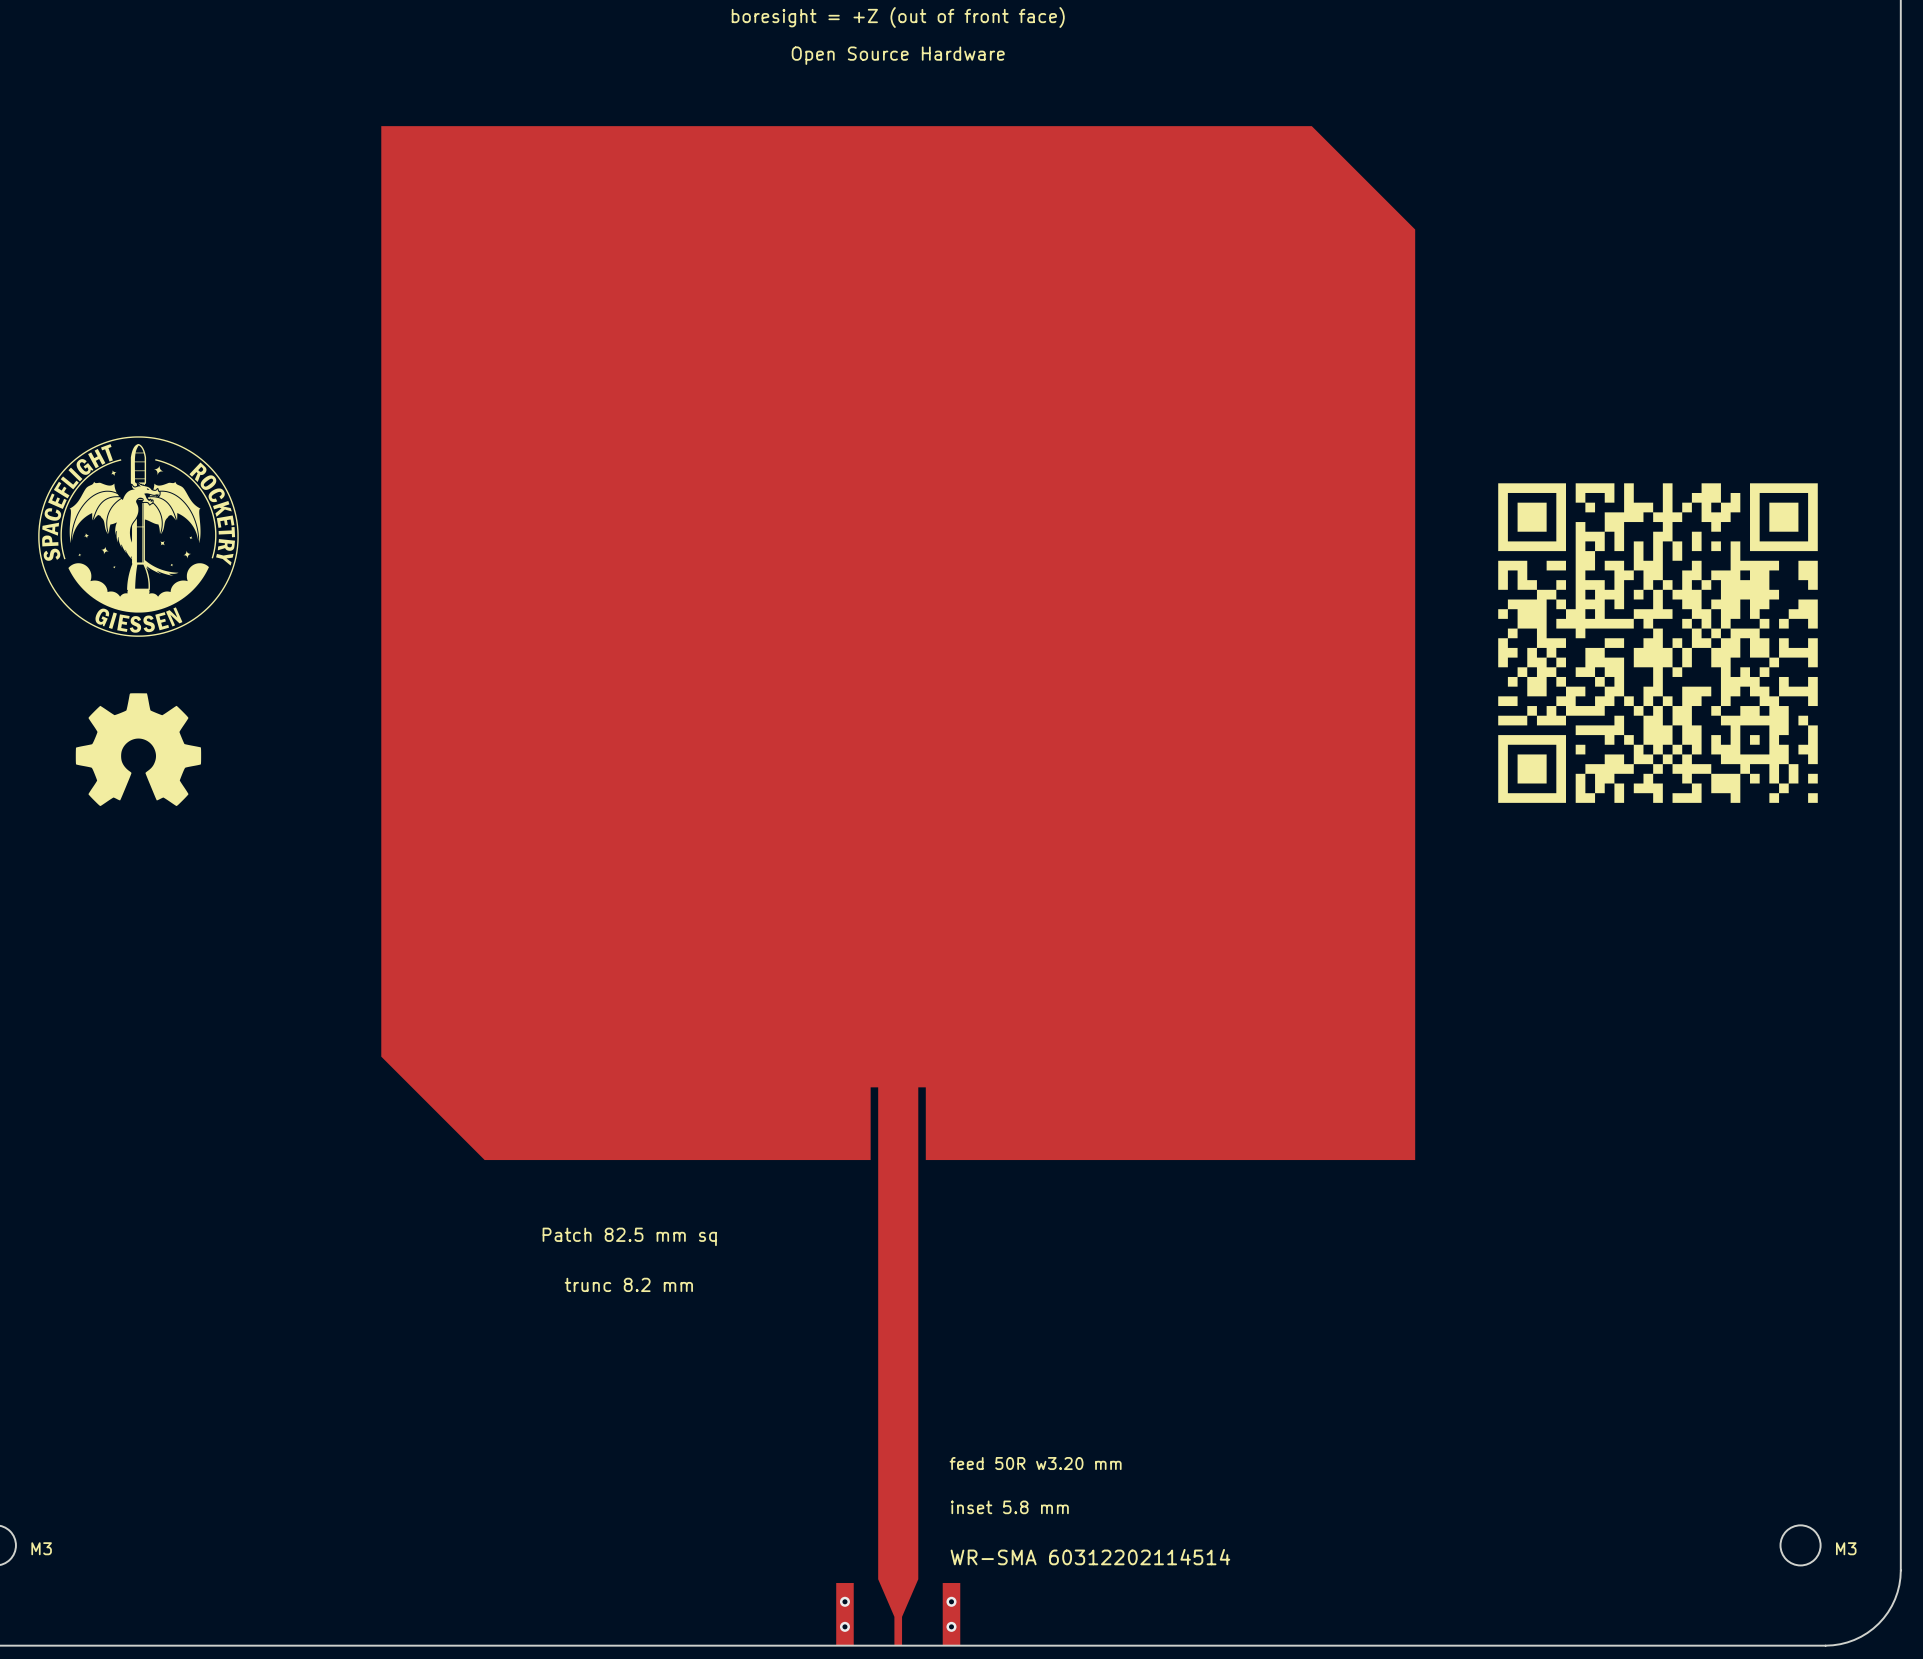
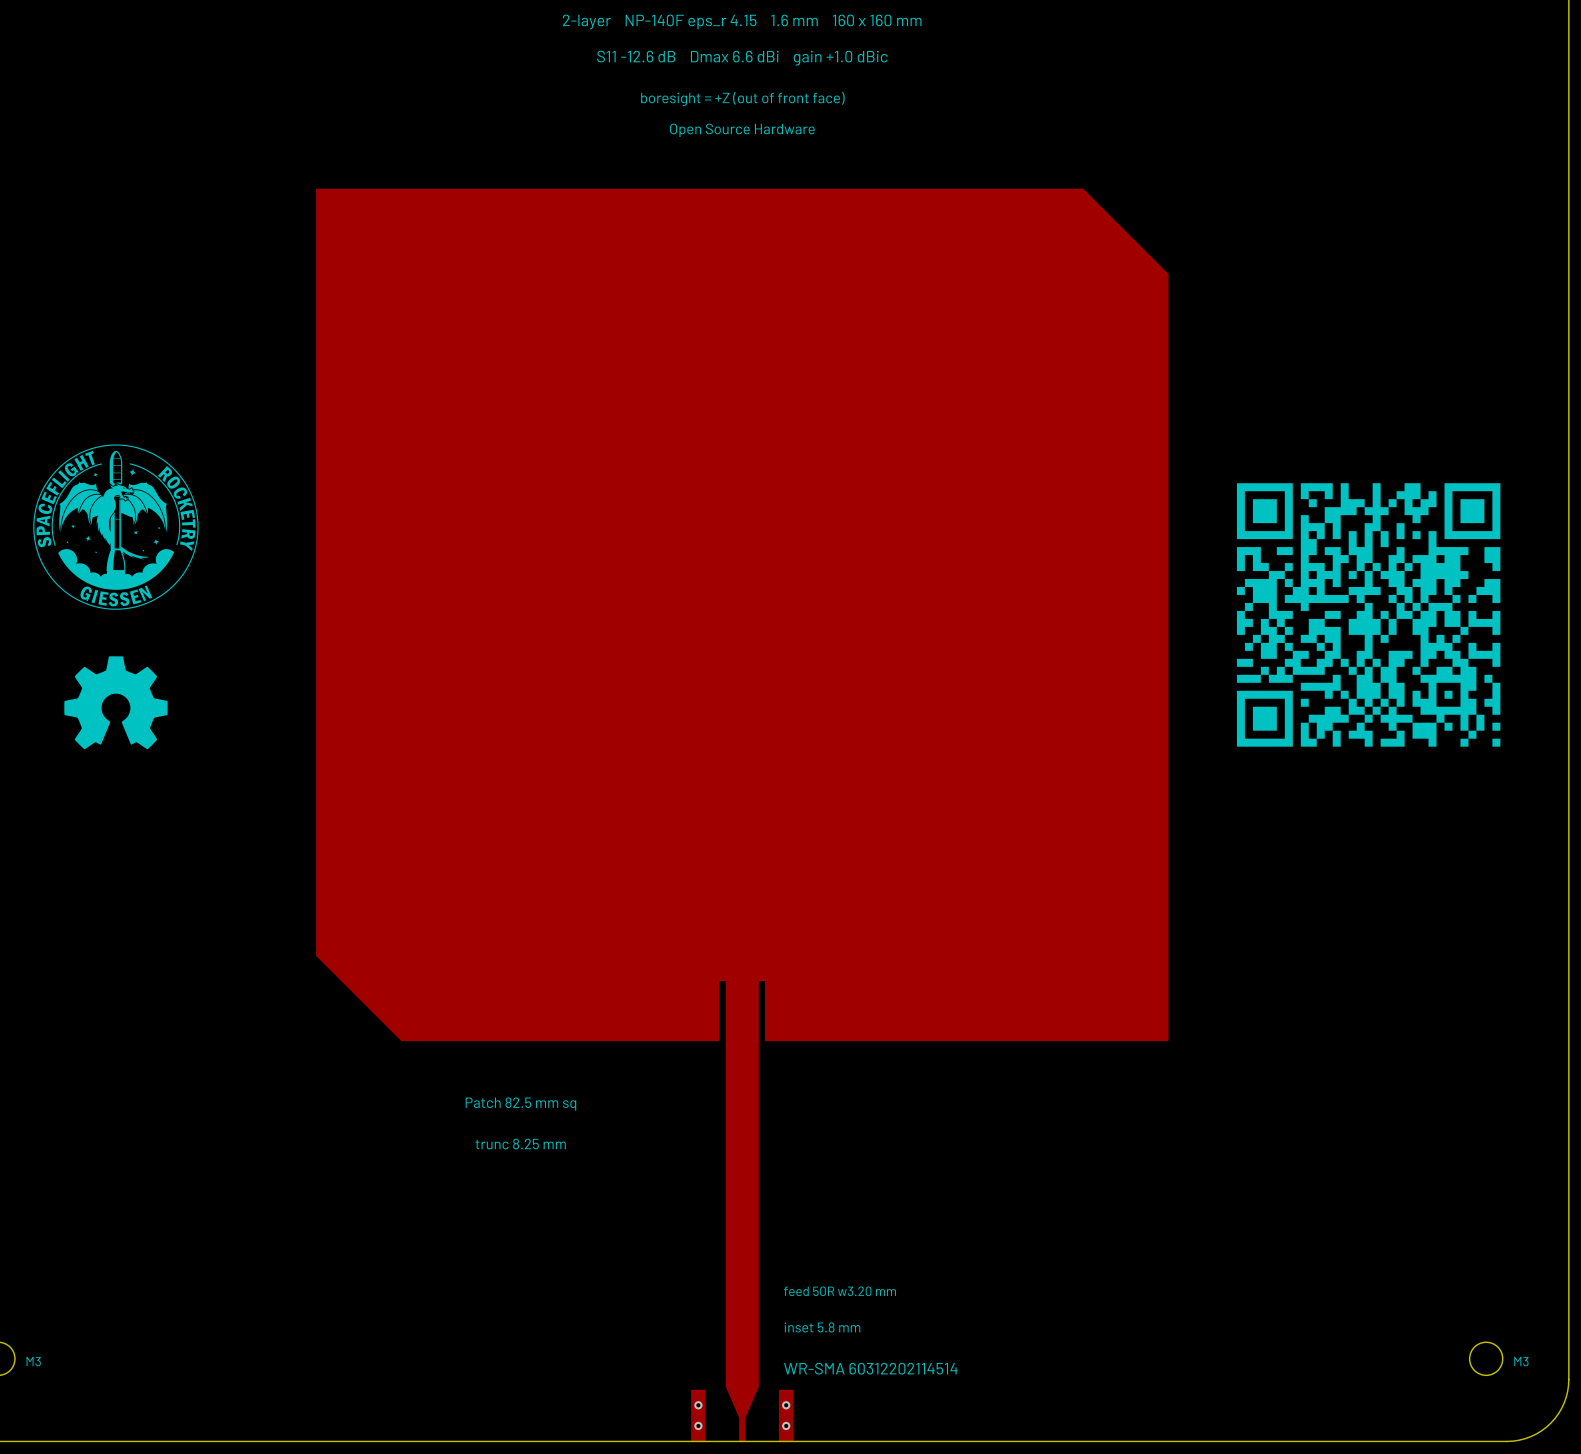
text: trunc 8.2 mm (628, 1284) -> trunc 8.25 mm (520, 1144)

